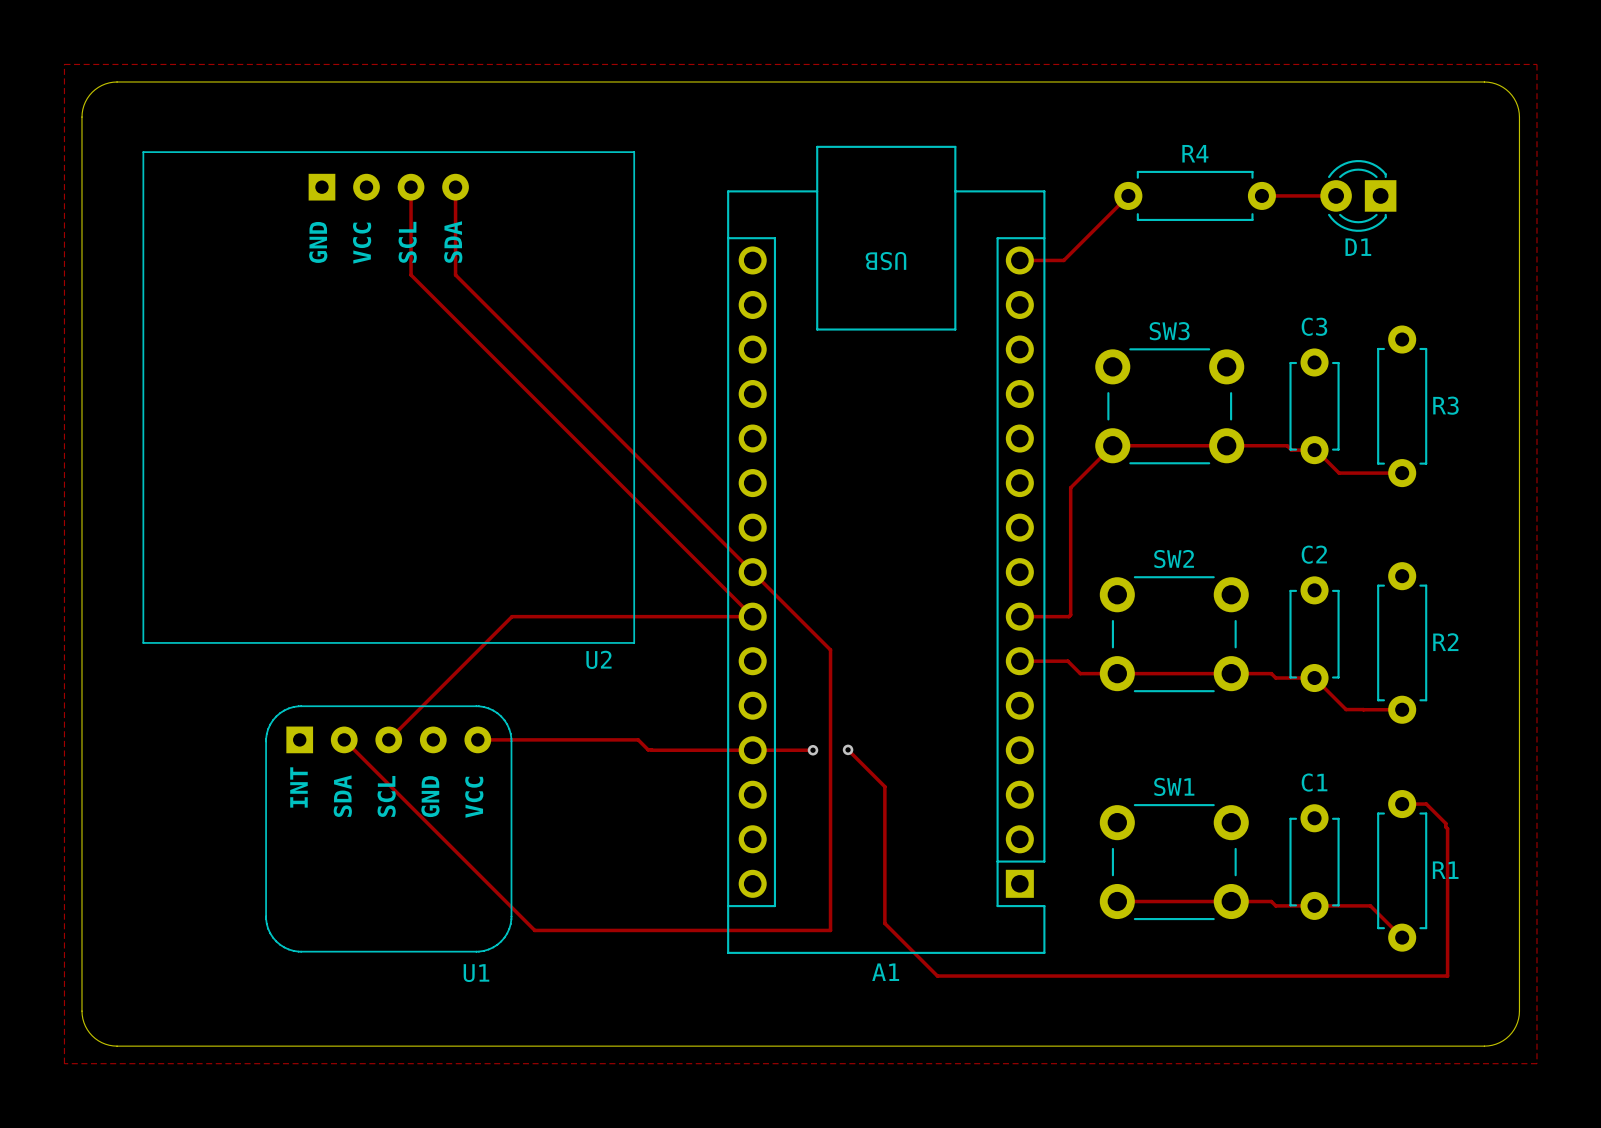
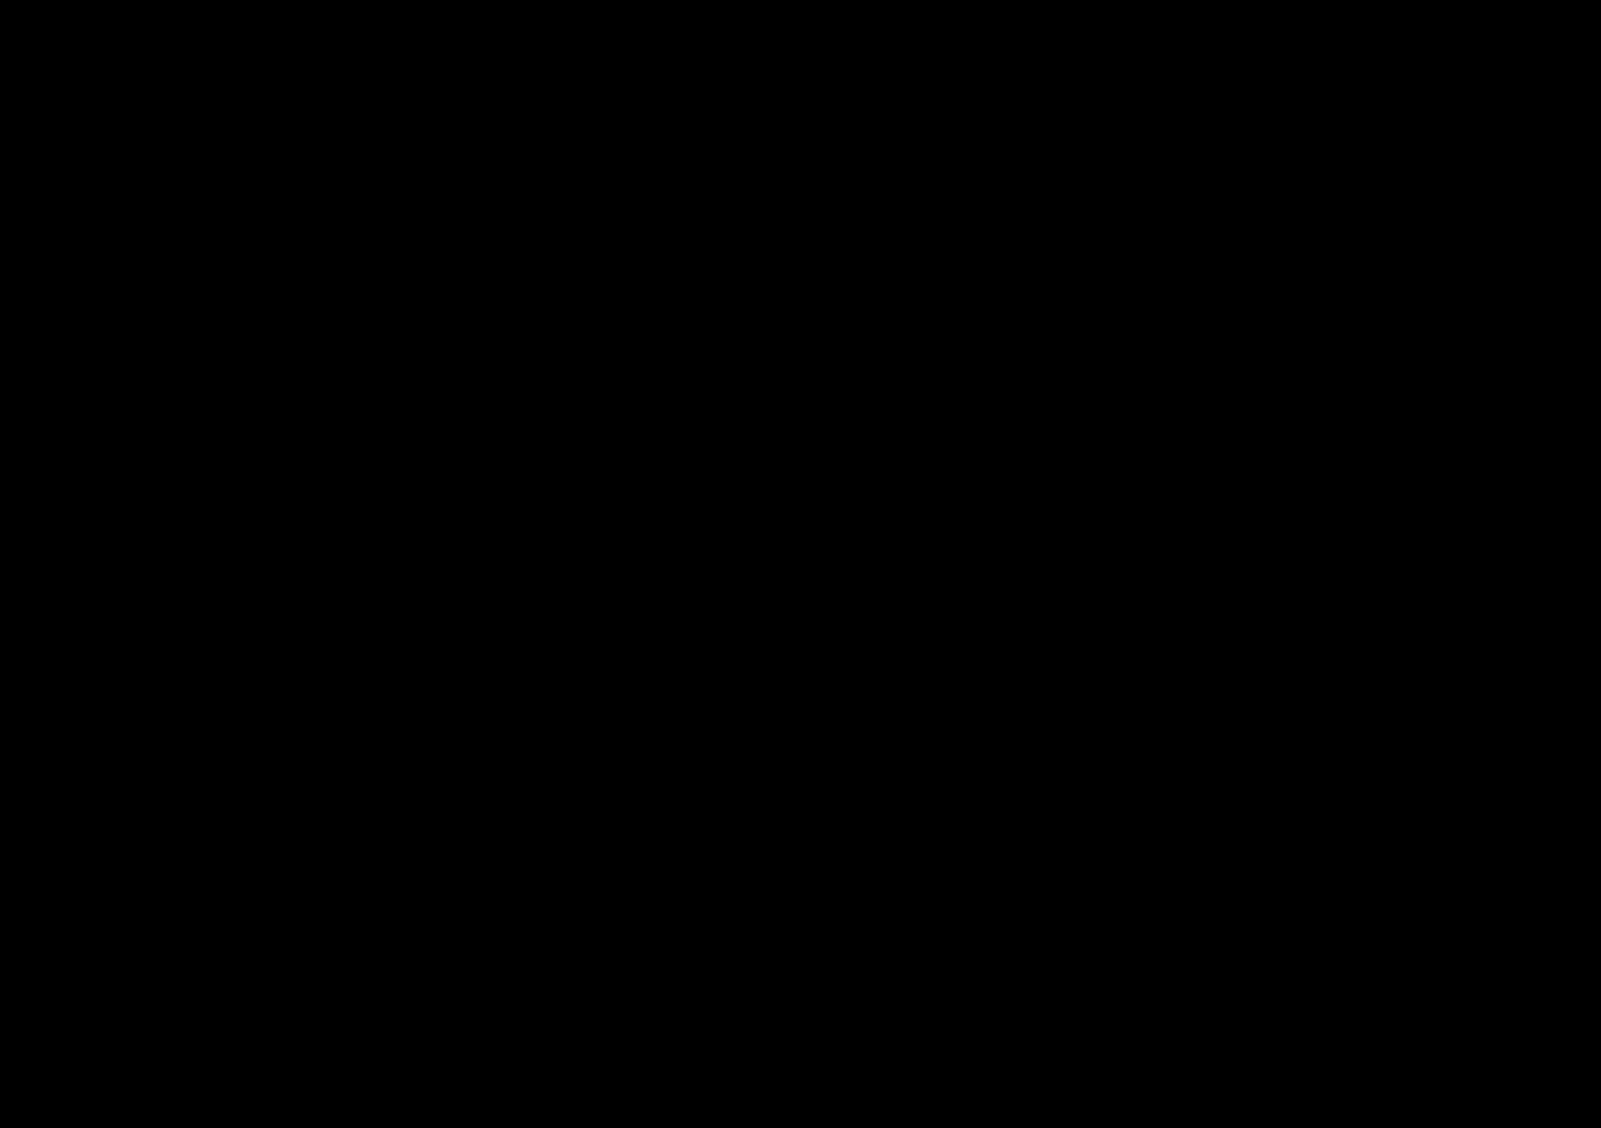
zone outline: (64, 64) (1536, 64) (1536, 1063) (64, 1063) (64, 64) -> none
board edge: (117, 81) (1484, 81) (1503, 87) (1514, 98) (1519, 117) (1519, 1011) (1514, 1029) (1499, 1042) (1484, 1046) (117, 1046) (98, 1040) (85, 1026) (81, 1011) (81, 117) (85, 101) (92, 92) (105, 83) (117, 81) -> none
track: (411, 187) (411, 275) (752, 616) (512, 616) (388, 739) -> none
track: (455, 187) (455, 275) (830, 649) (830, 930) (534, 930) (344, 739) -> none
track: (1128, 195) (1063, 260) (1019, 260) -> none
R4: (1195, 195) -> none
track: (1261, 195) (1336, 195) -> none
D1: (1358, 195) -> none
U2: (388, 397) -> none
SW3: (1169, 406) -> none
C3: (1314, 406) -> none
R3: (1402, 406) -> none
track: (1402, 473) (1339, 473) (1316, 450) (1291, 450) (1287, 445) (1112, 445) (1070, 487) (1070, 614) (1068, 616) (1019, 616) -> none
A1: (886, 549) -> none
SW2: (1174, 634) -> none
C2: (1314, 634) -> none
R2: (1402, 642) -> none
track: (1019, 661) (1067, 661) (1080, 673) (1271, 673) (1275, 678) (1314, 678) (1346, 709) (1363, 709) -> none
track: (1363, 709) (1402, 709) -> none
track: (477, 739) (638, 739) (648, 749) (652, 750) (812, 750) -> none
track: (848, 749) (884, 786) (884, 923) (937, 976) (1447, 976) (1447, 828) (1445, 823) (1426, 804) (1402, 804) -> none
via: (848, 749) -> none
via: (812, 750) -> none
U1: (388, 828) -> none
SW1: (1174, 862) -> none
C1: (1314, 862) -> none
R1: (1402, 870) -> none
track: (1117, 901) (1271, 901) (1275, 905) (1370, 905) (1402, 937) -> none

